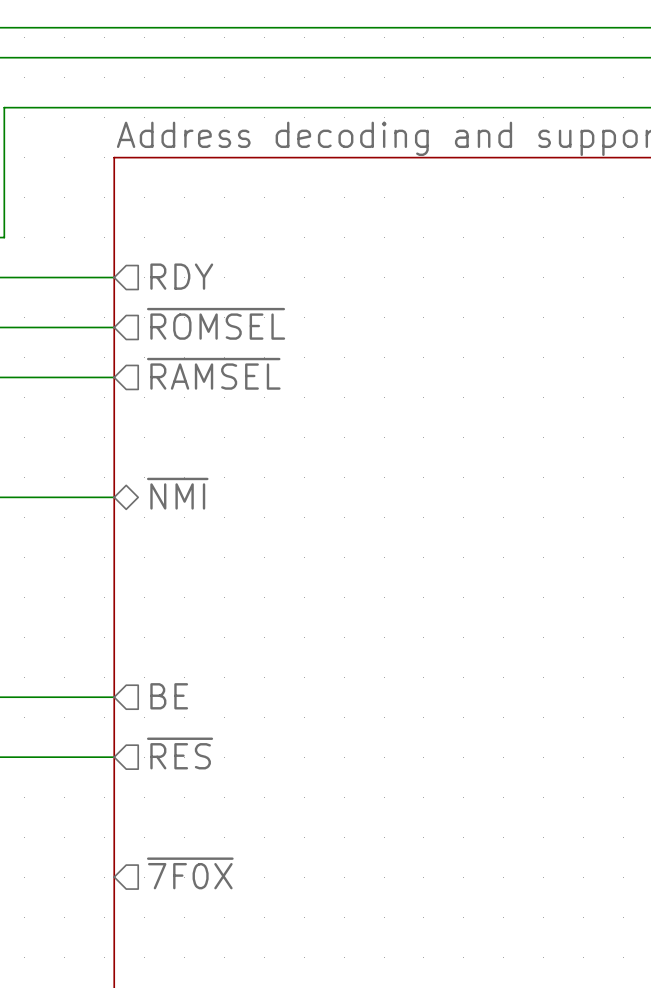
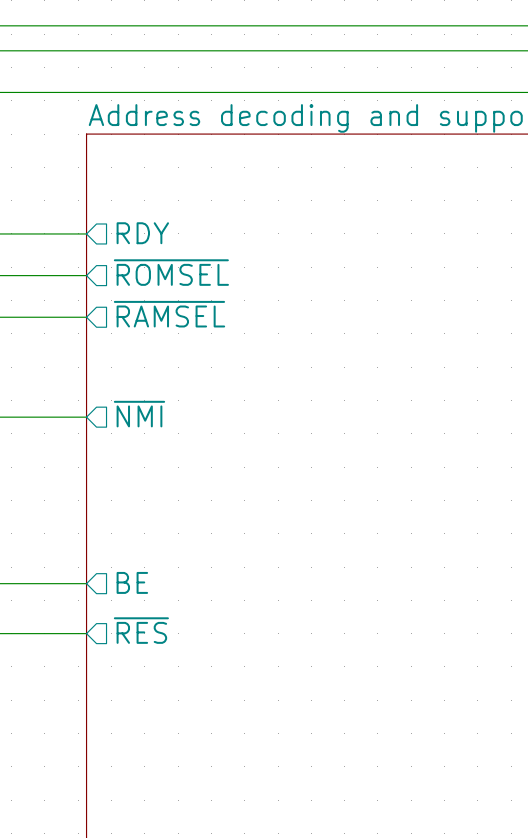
sheet pin shape: bidirectional (177, 493) -> output (139, 414)
sheet pin: ~{7F0X} (190, 873) -> none

